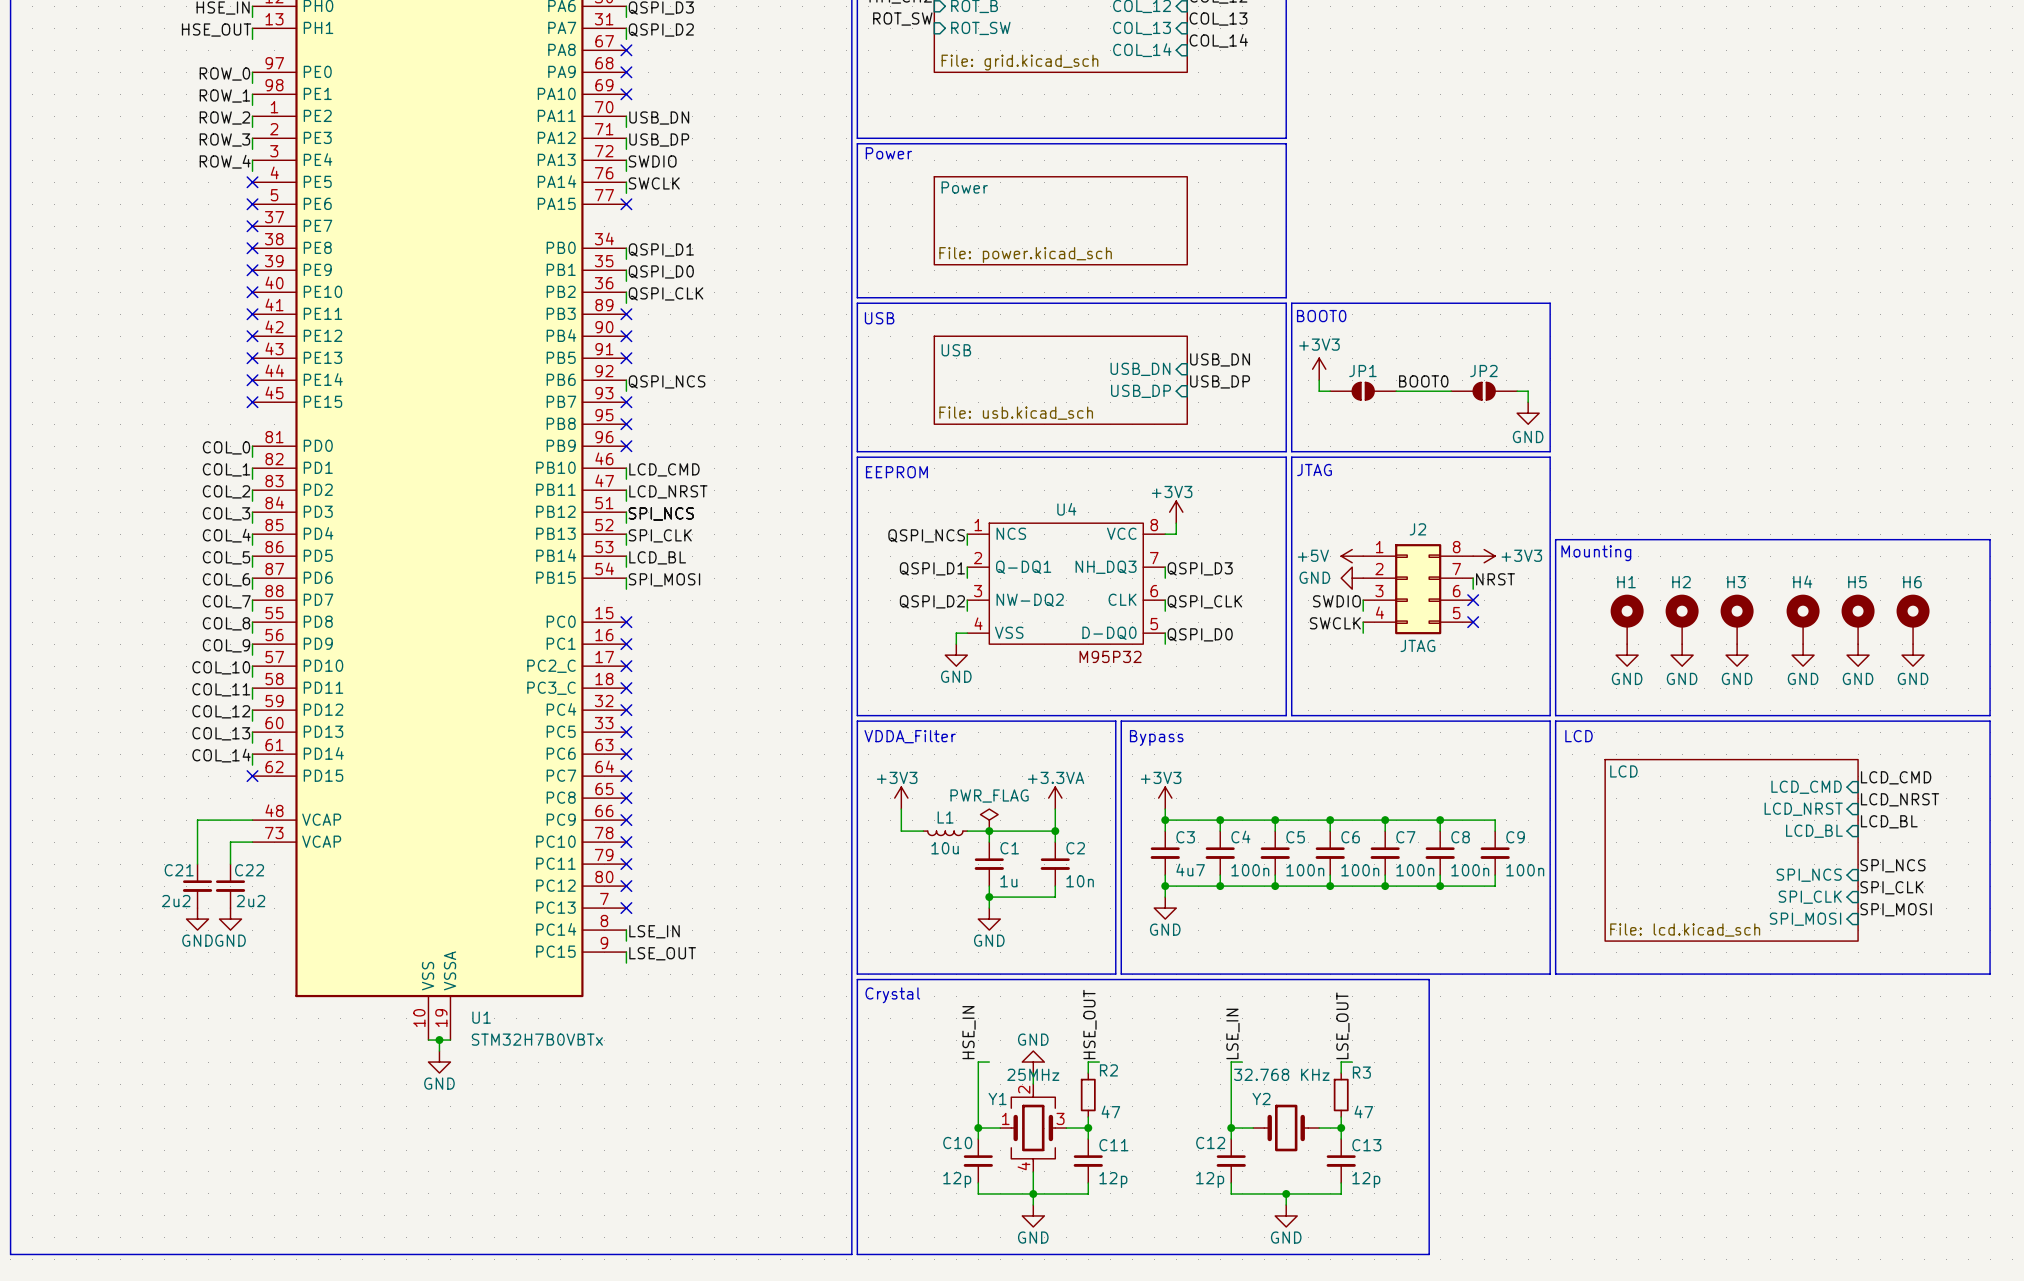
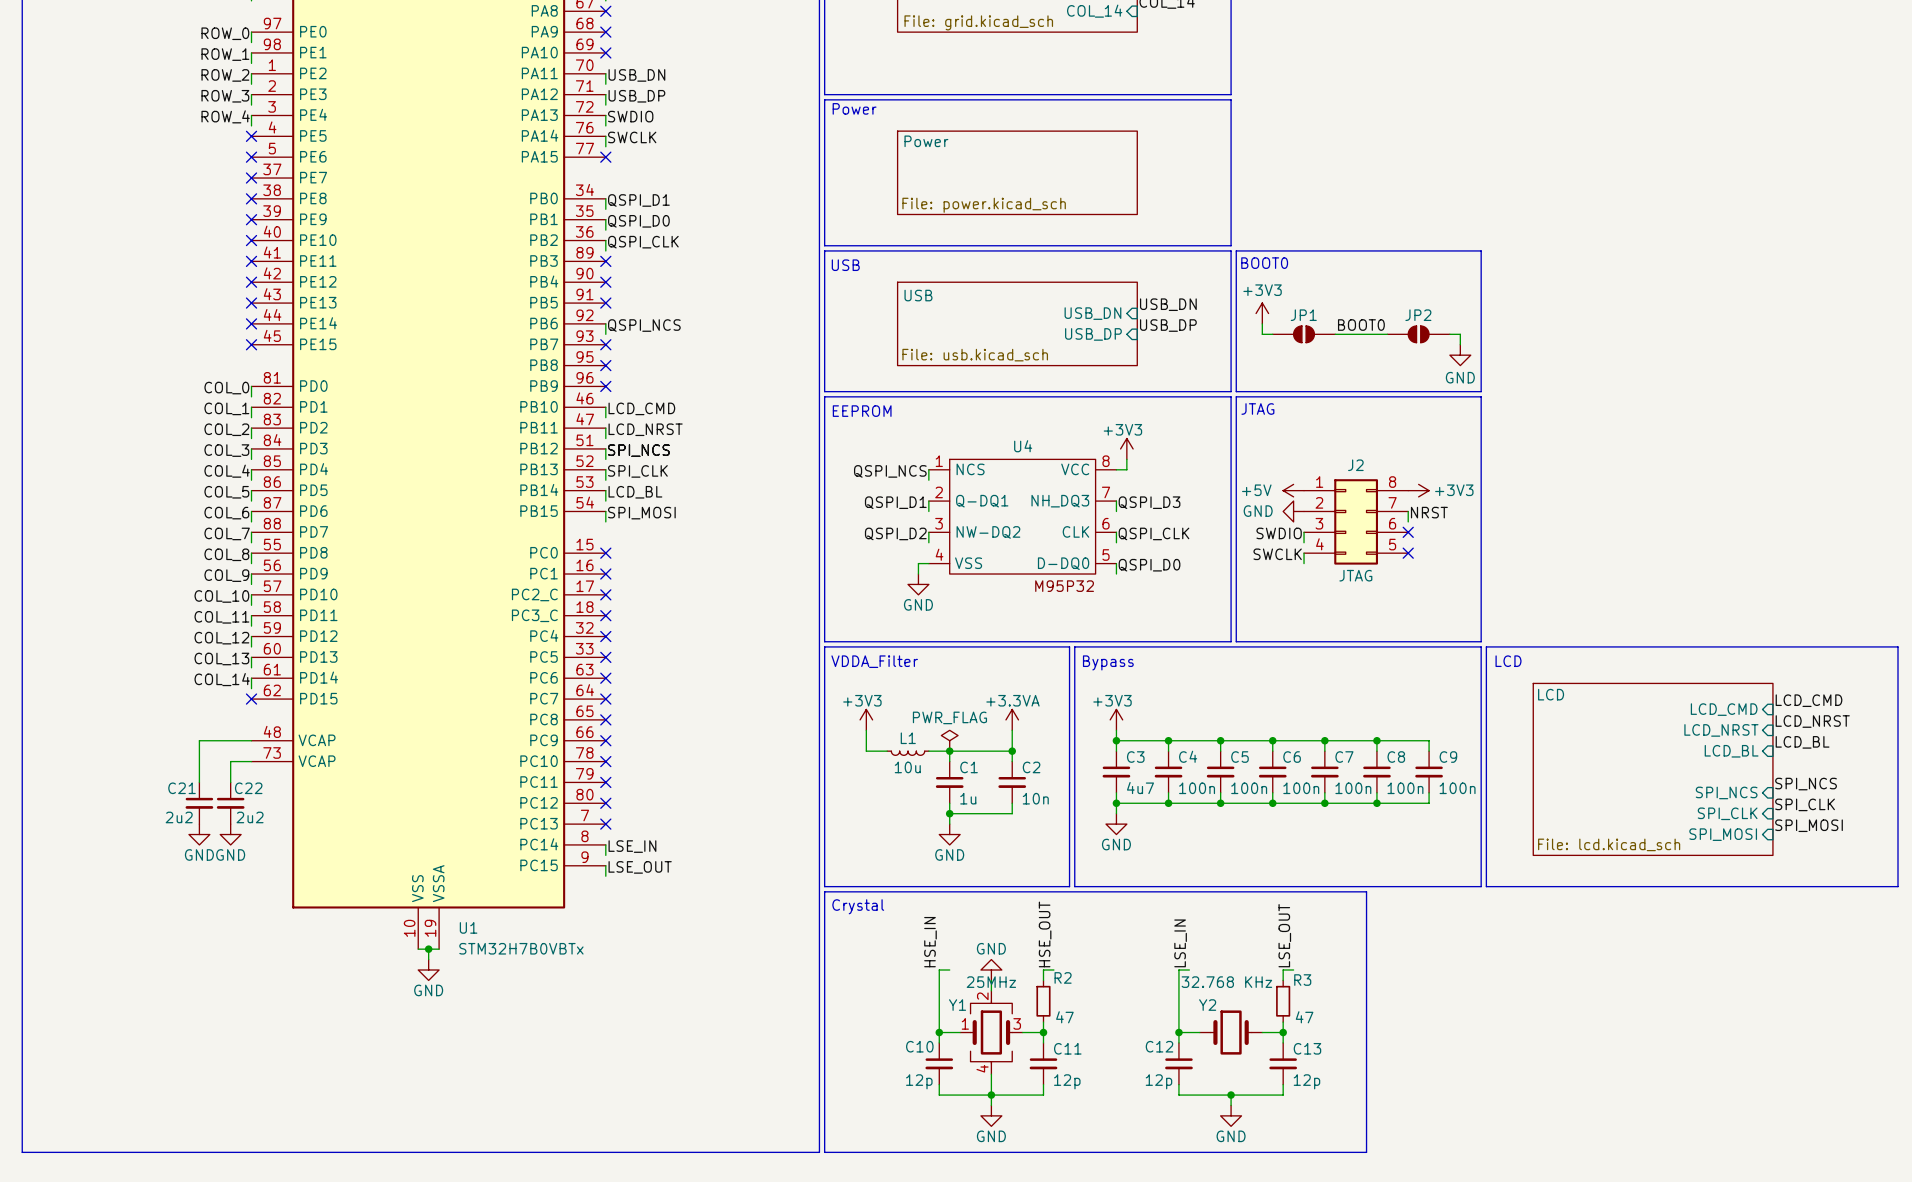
line: (1555, 539) (1990, 539) (1990, 715) (1555, 715) (1555, 539) -> none
text: Mounting (1596, 553) -> none
H1: (1627, 619) -> none
H2: (1682, 619) -> none
H3: (1737, 619) -> none
H4: (1803, 619) -> none
H5: (1858, 619) -> none
H6: (1913, 619) -> none
power symbol: GND (1627, 655) -> none
power symbol: GND (1682, 655) -> none
power symbol: GND (1737, 655) -> none
power symbol: GND (1803, 655) -> none
power symbol: GND (1858, 655) -> none
power symbol: GND (1913, 655) -> none

